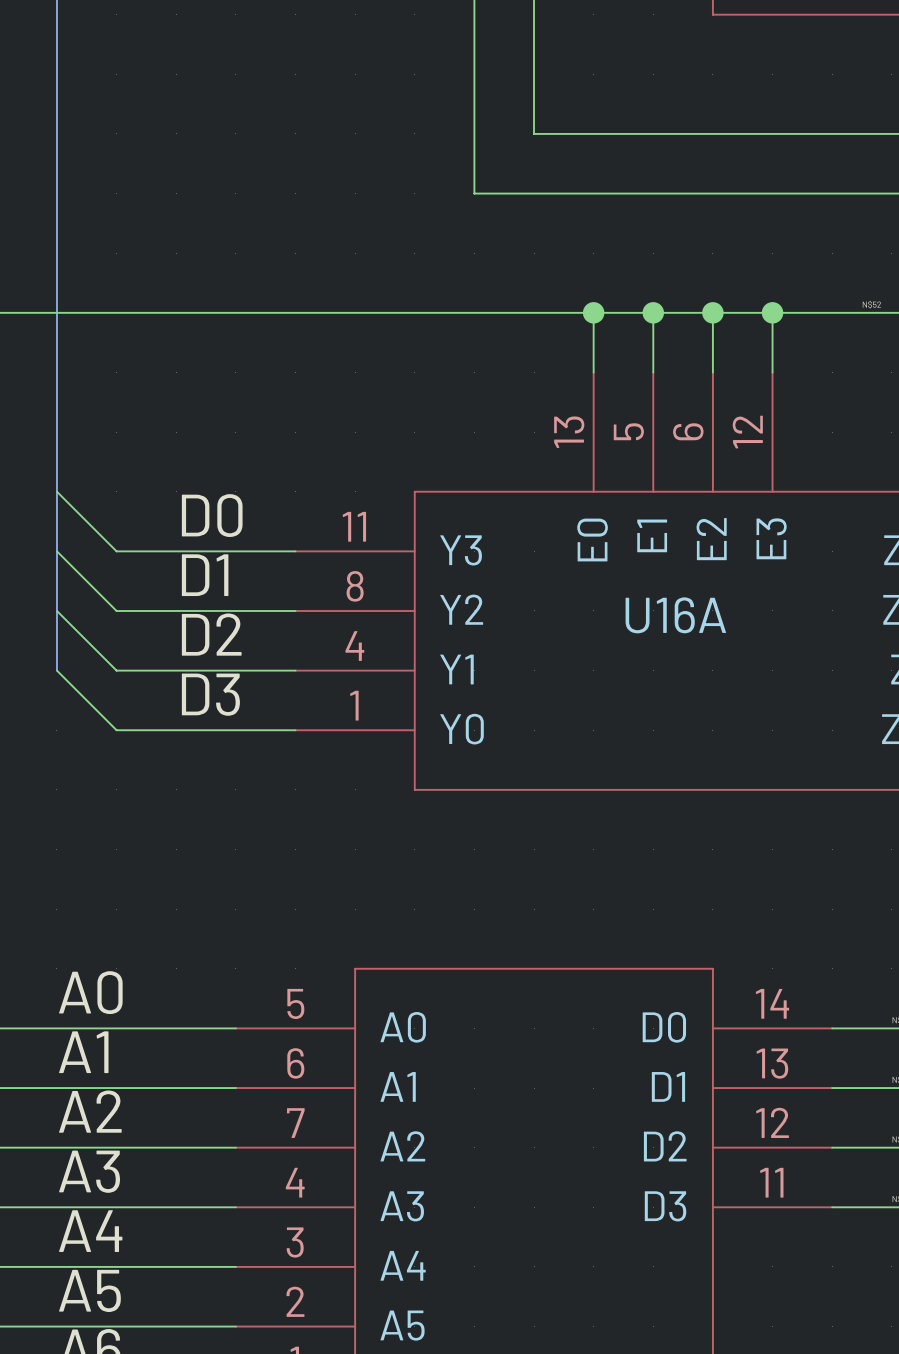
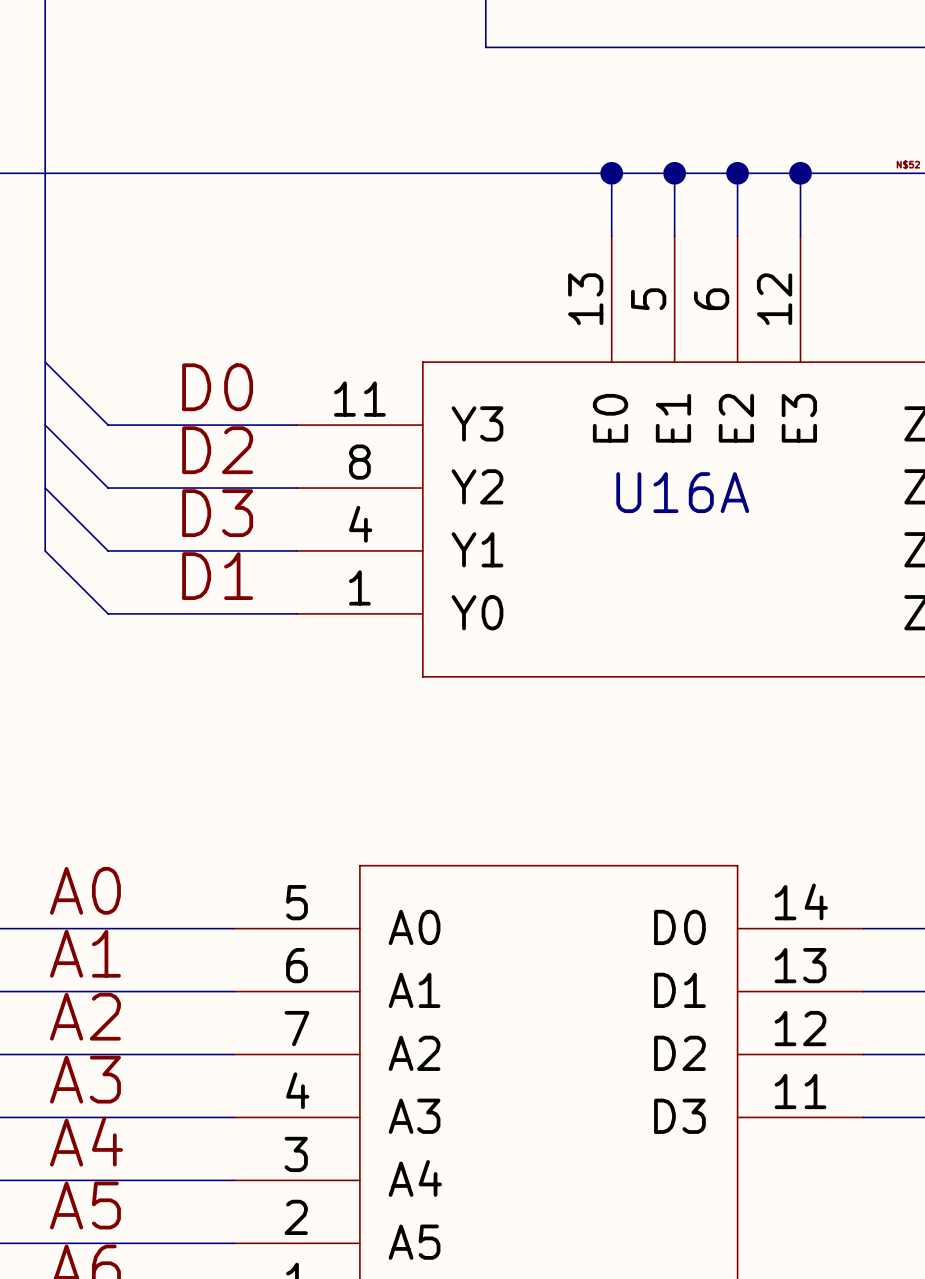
label: D1 (205, 575) -> D2 (217, 450)
label: D2 (211, 634) -> D3 (217, 513)
label: D3 (210, 694) -> D1 (217, 576)

